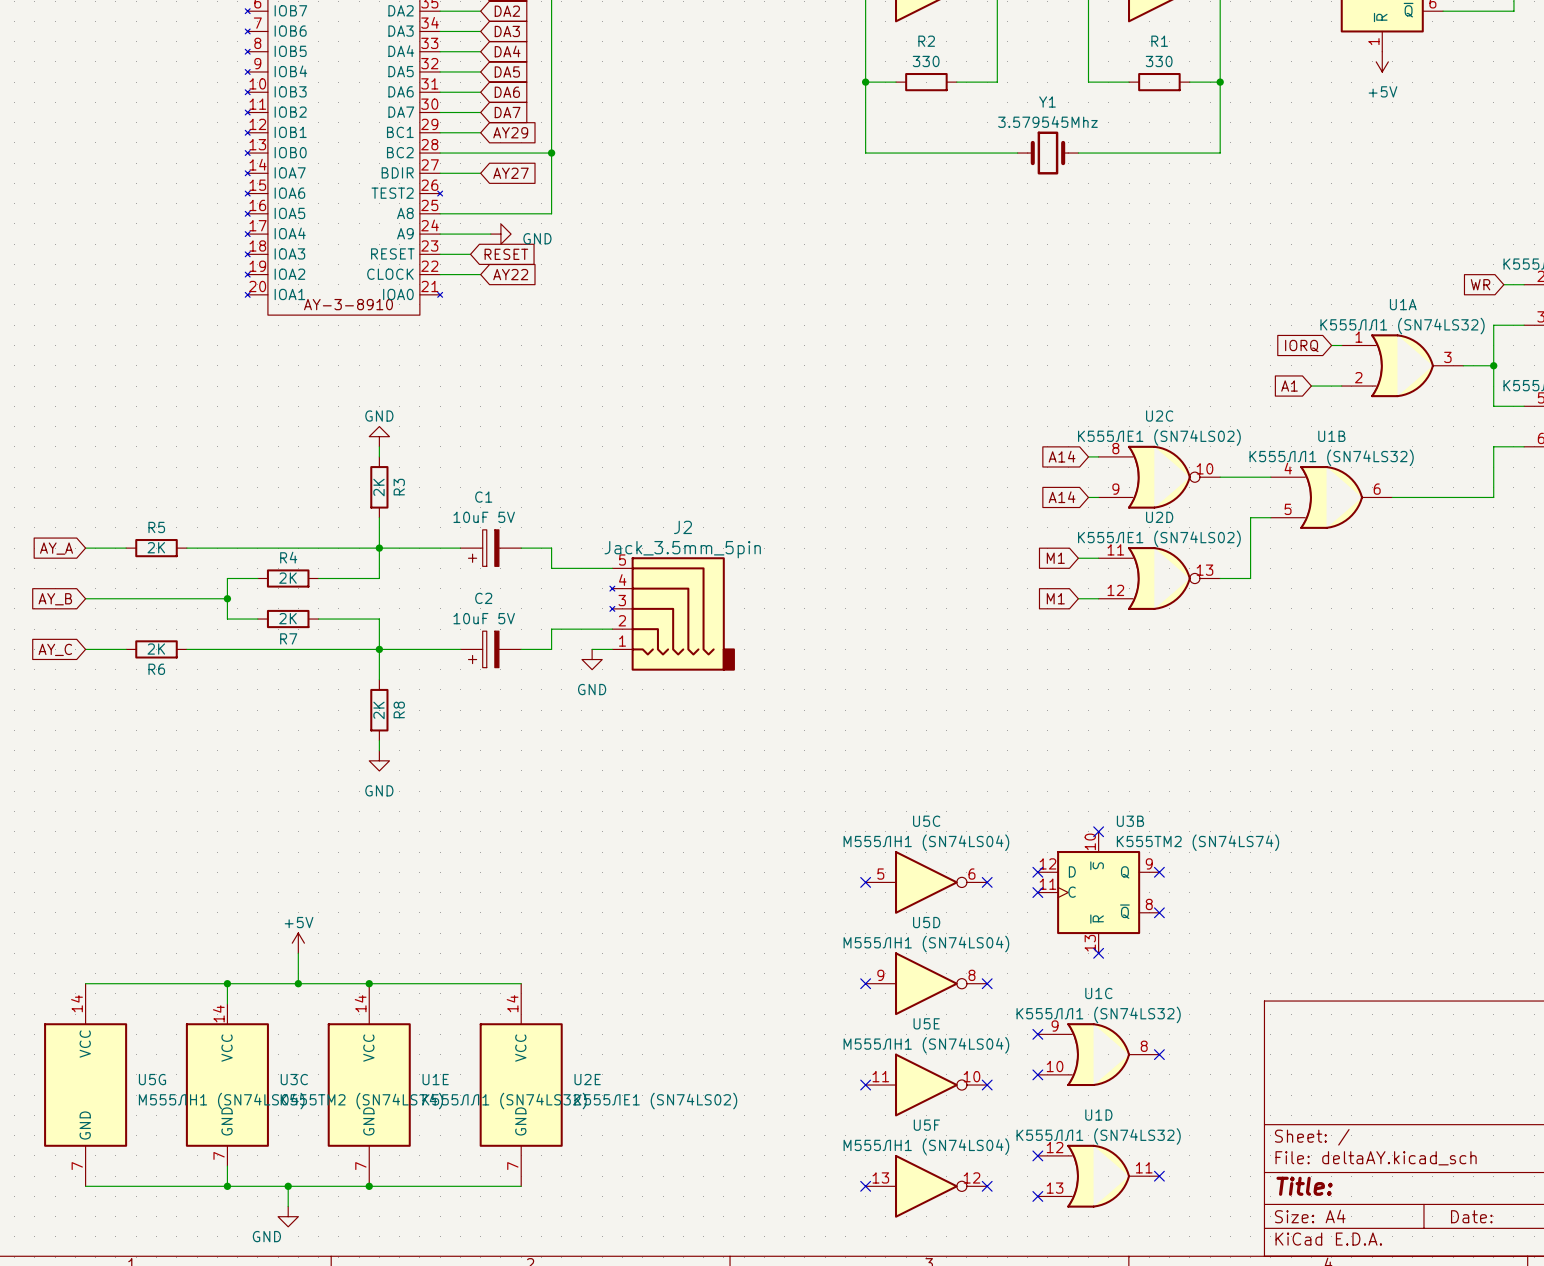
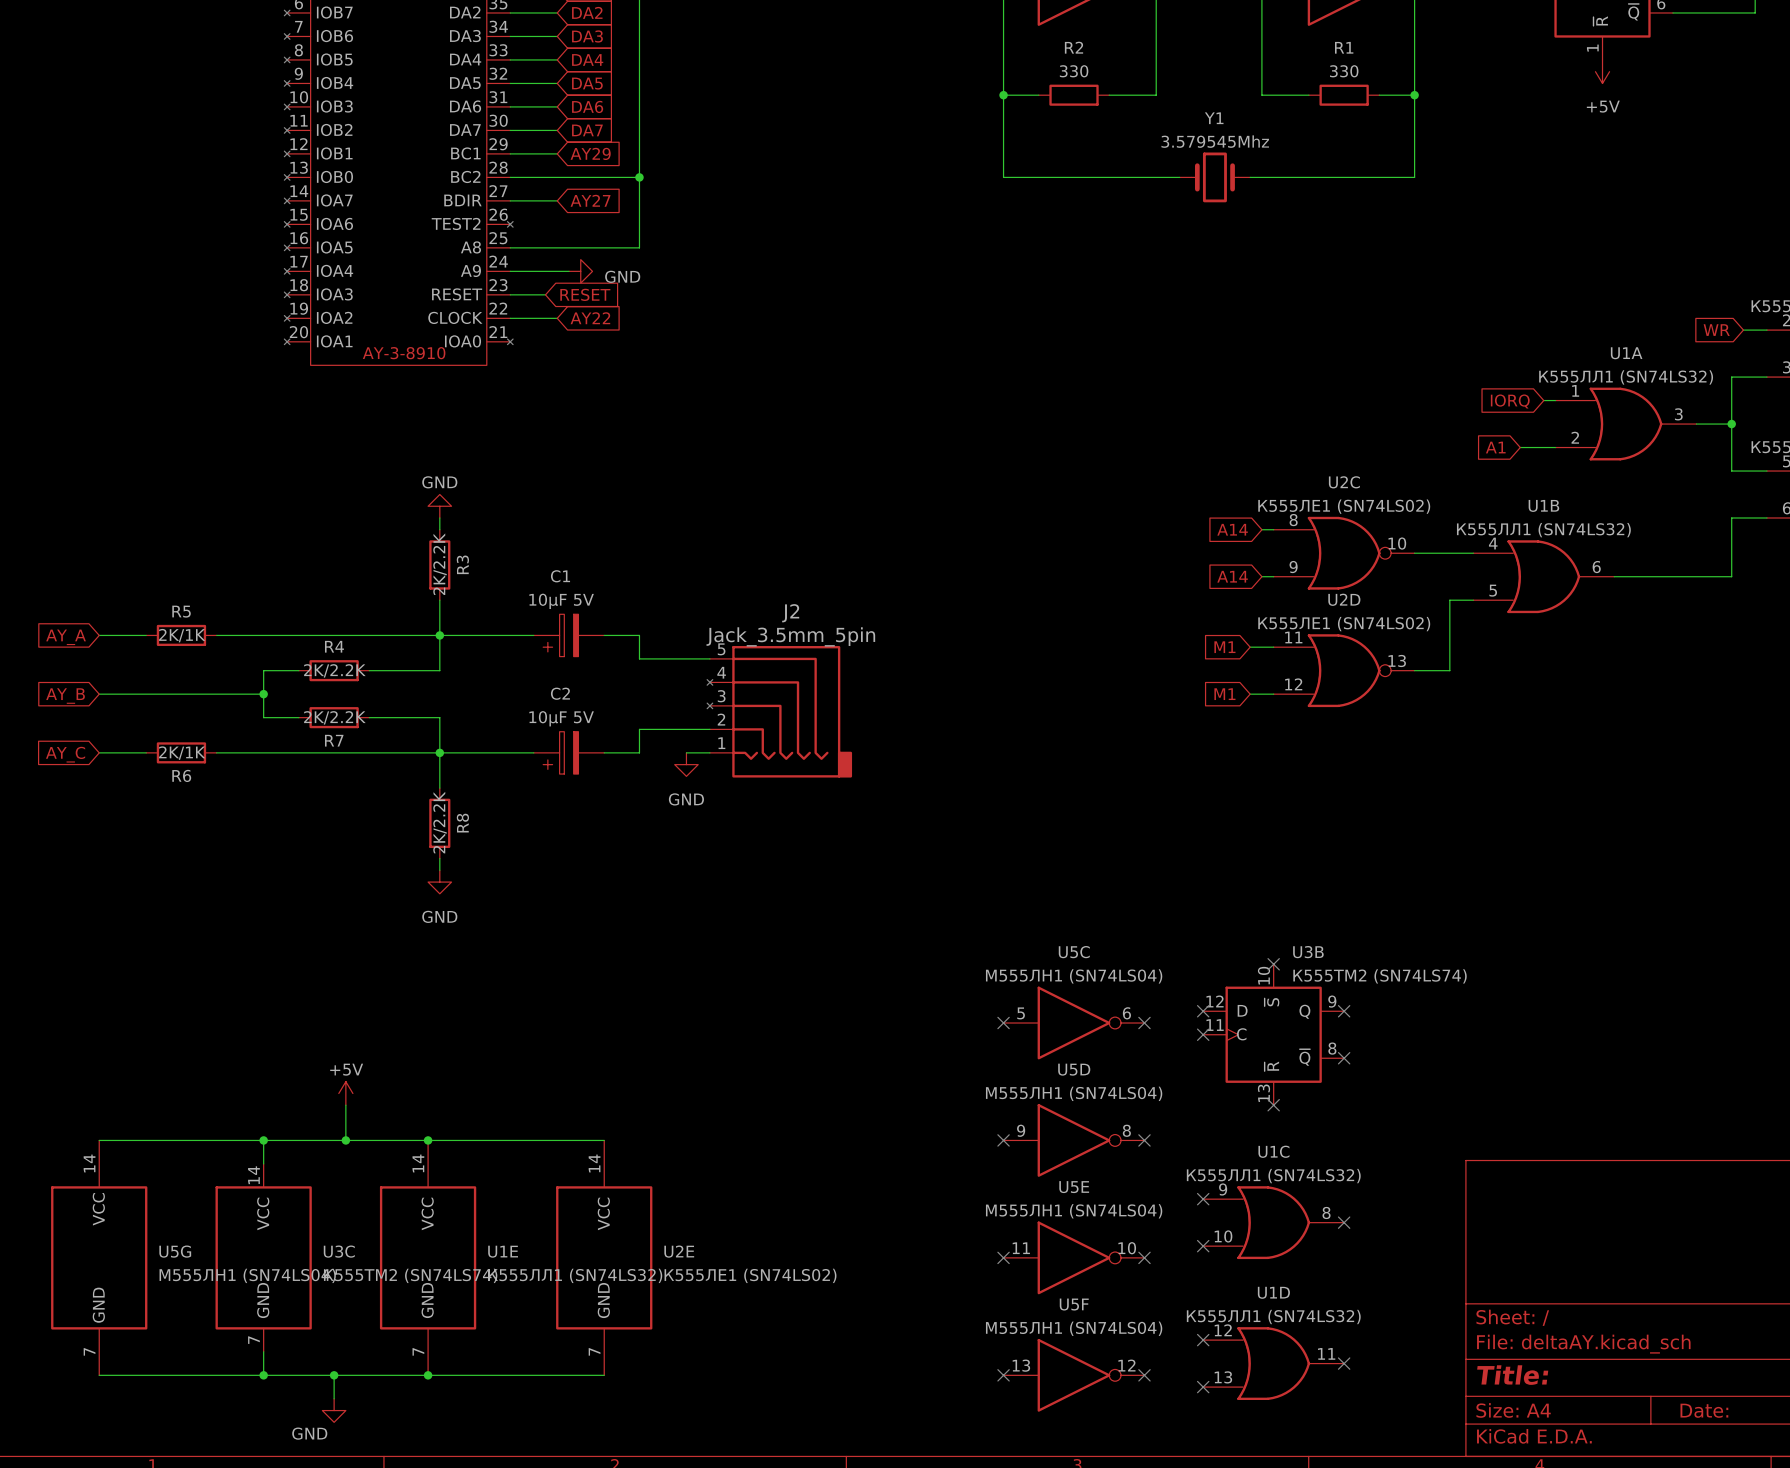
R3 value: 2K (378, 487) -> 2K/2.2K (440, 564)
C1 value: 10uF 5V (484, 517) -> 10μF 5V (561, 601)
R5 value: 2K (156, 547) -> 2K/1K (182, 635)
R4 value: 2K (287, 578) -> 2K/2.2K (334, 670)
R7 value: 2K (287, 618) -> 2K/2.2K (334, 717)
C2 value: 10uF 5V (484, 618) -> 10μF 5V (561, 718)
R6 value: 2K (156, 649) -> 2K/1K (182, 753)
R8 value: 2K (378, 710) -> 2K/2.2K (440, 822)

